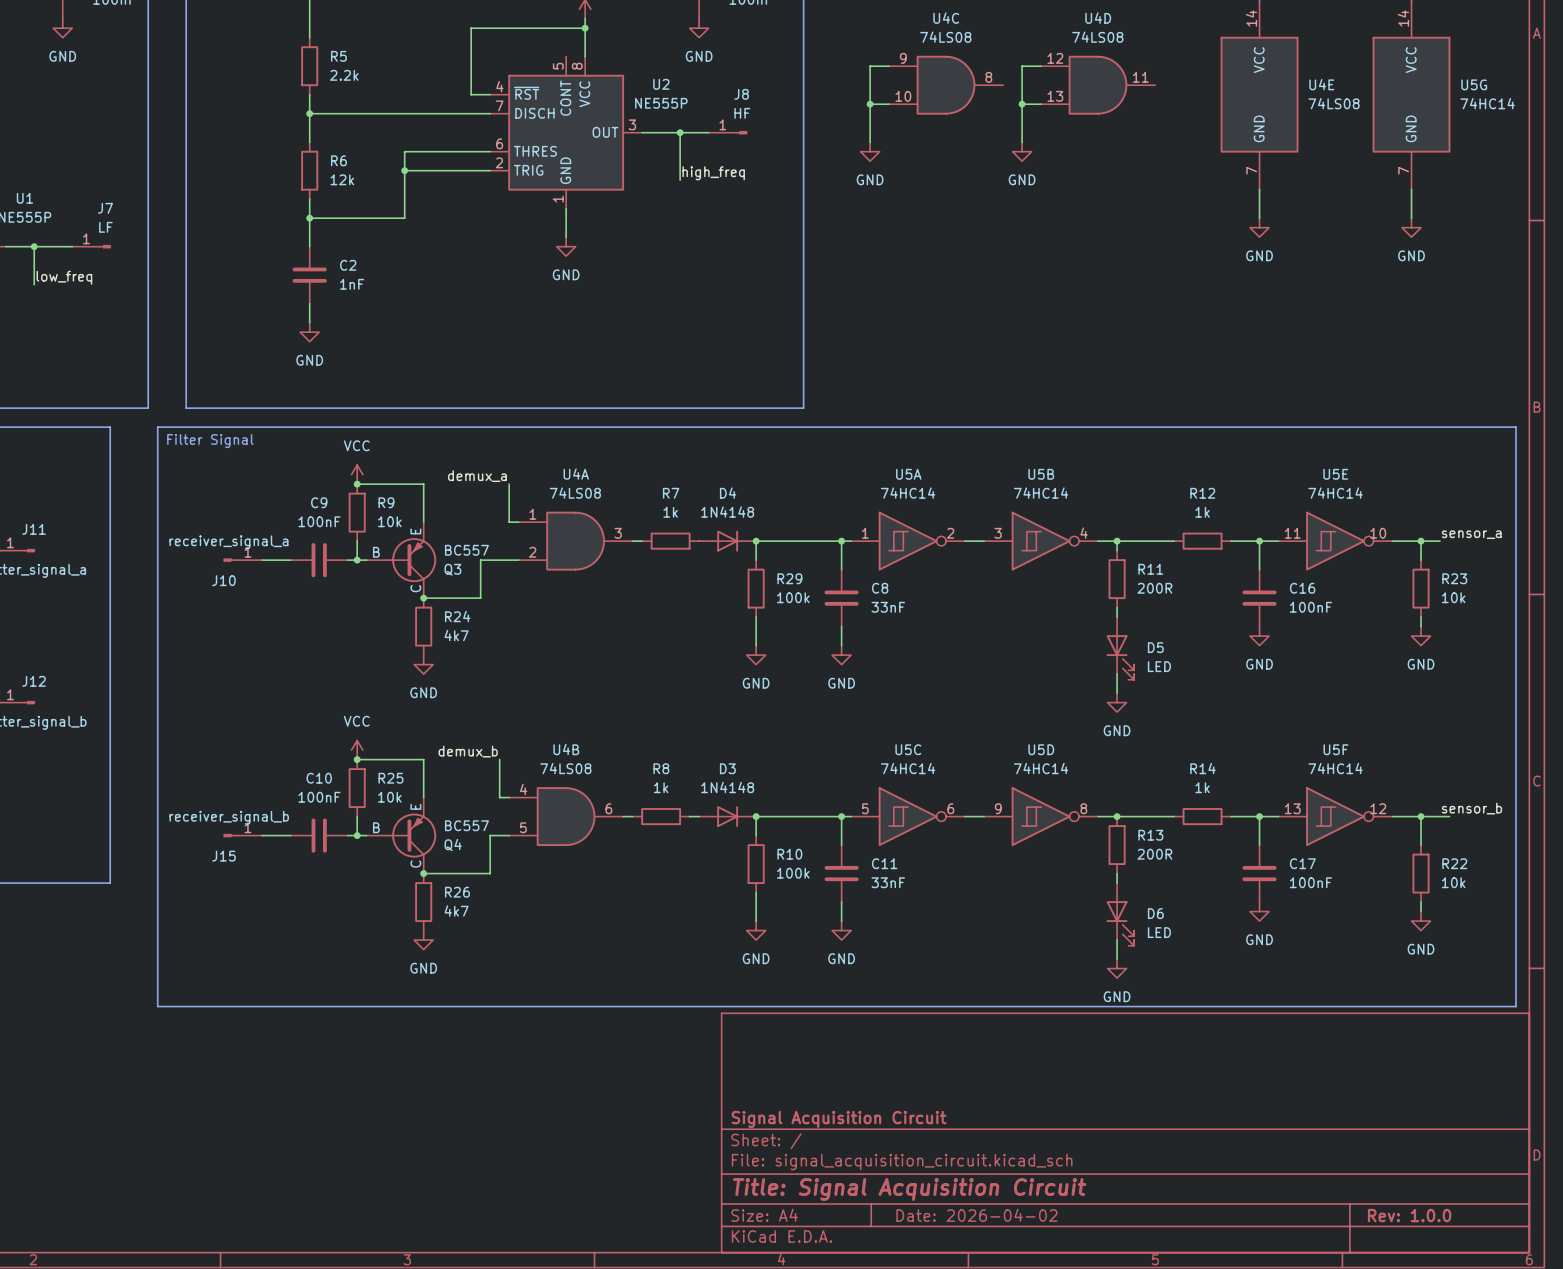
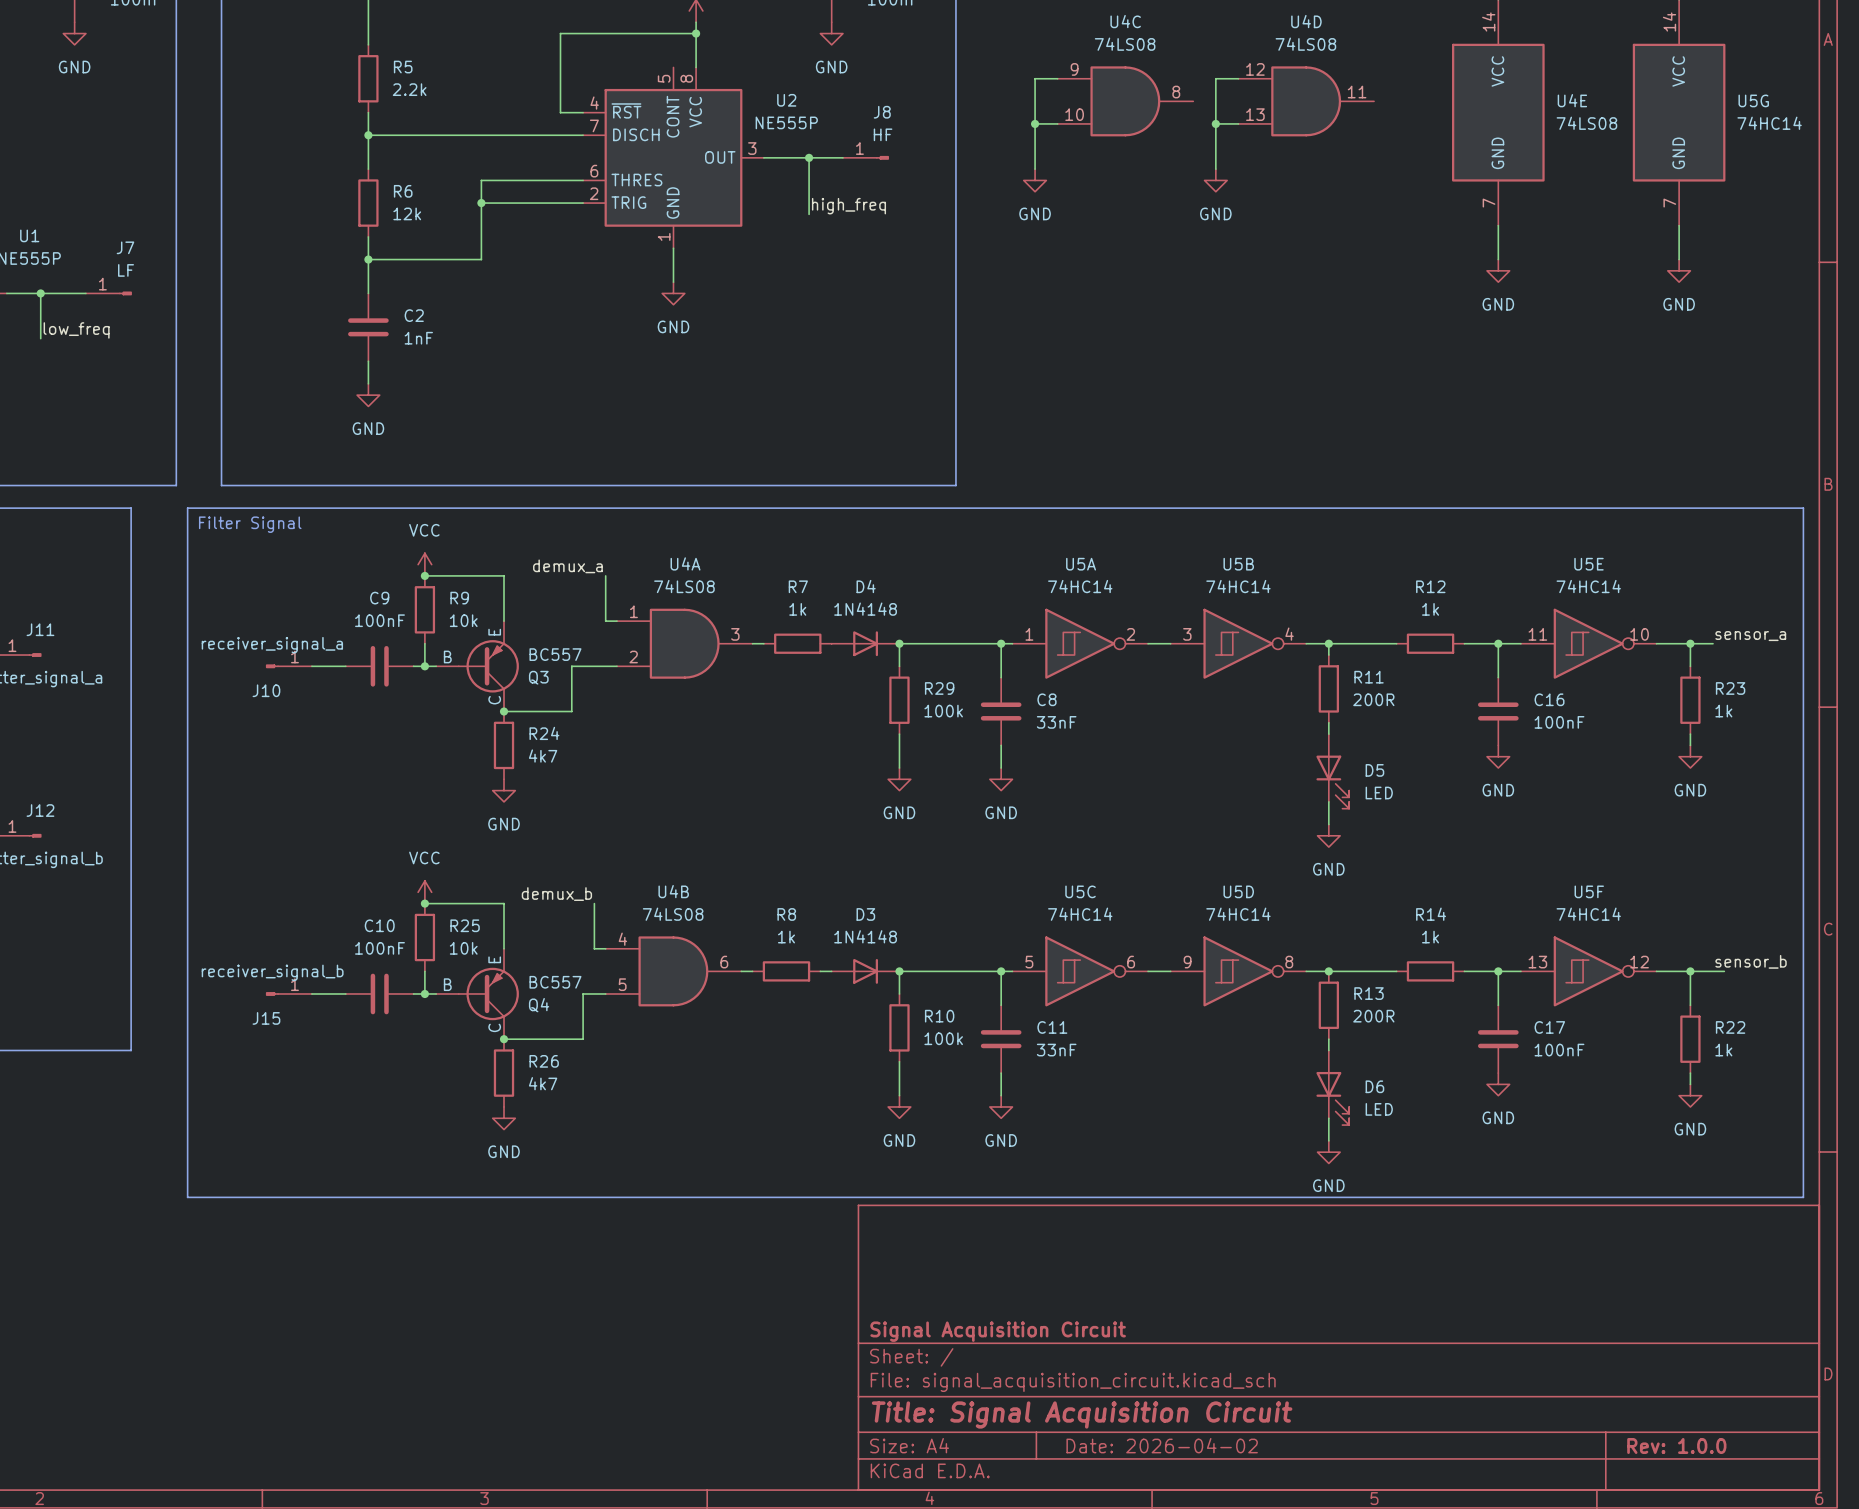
R23 value: 10k (1453, 597) -> 1k (1723, 711)
R22 value: 10k (1453, 882) -> 1k (1723, 1050)

